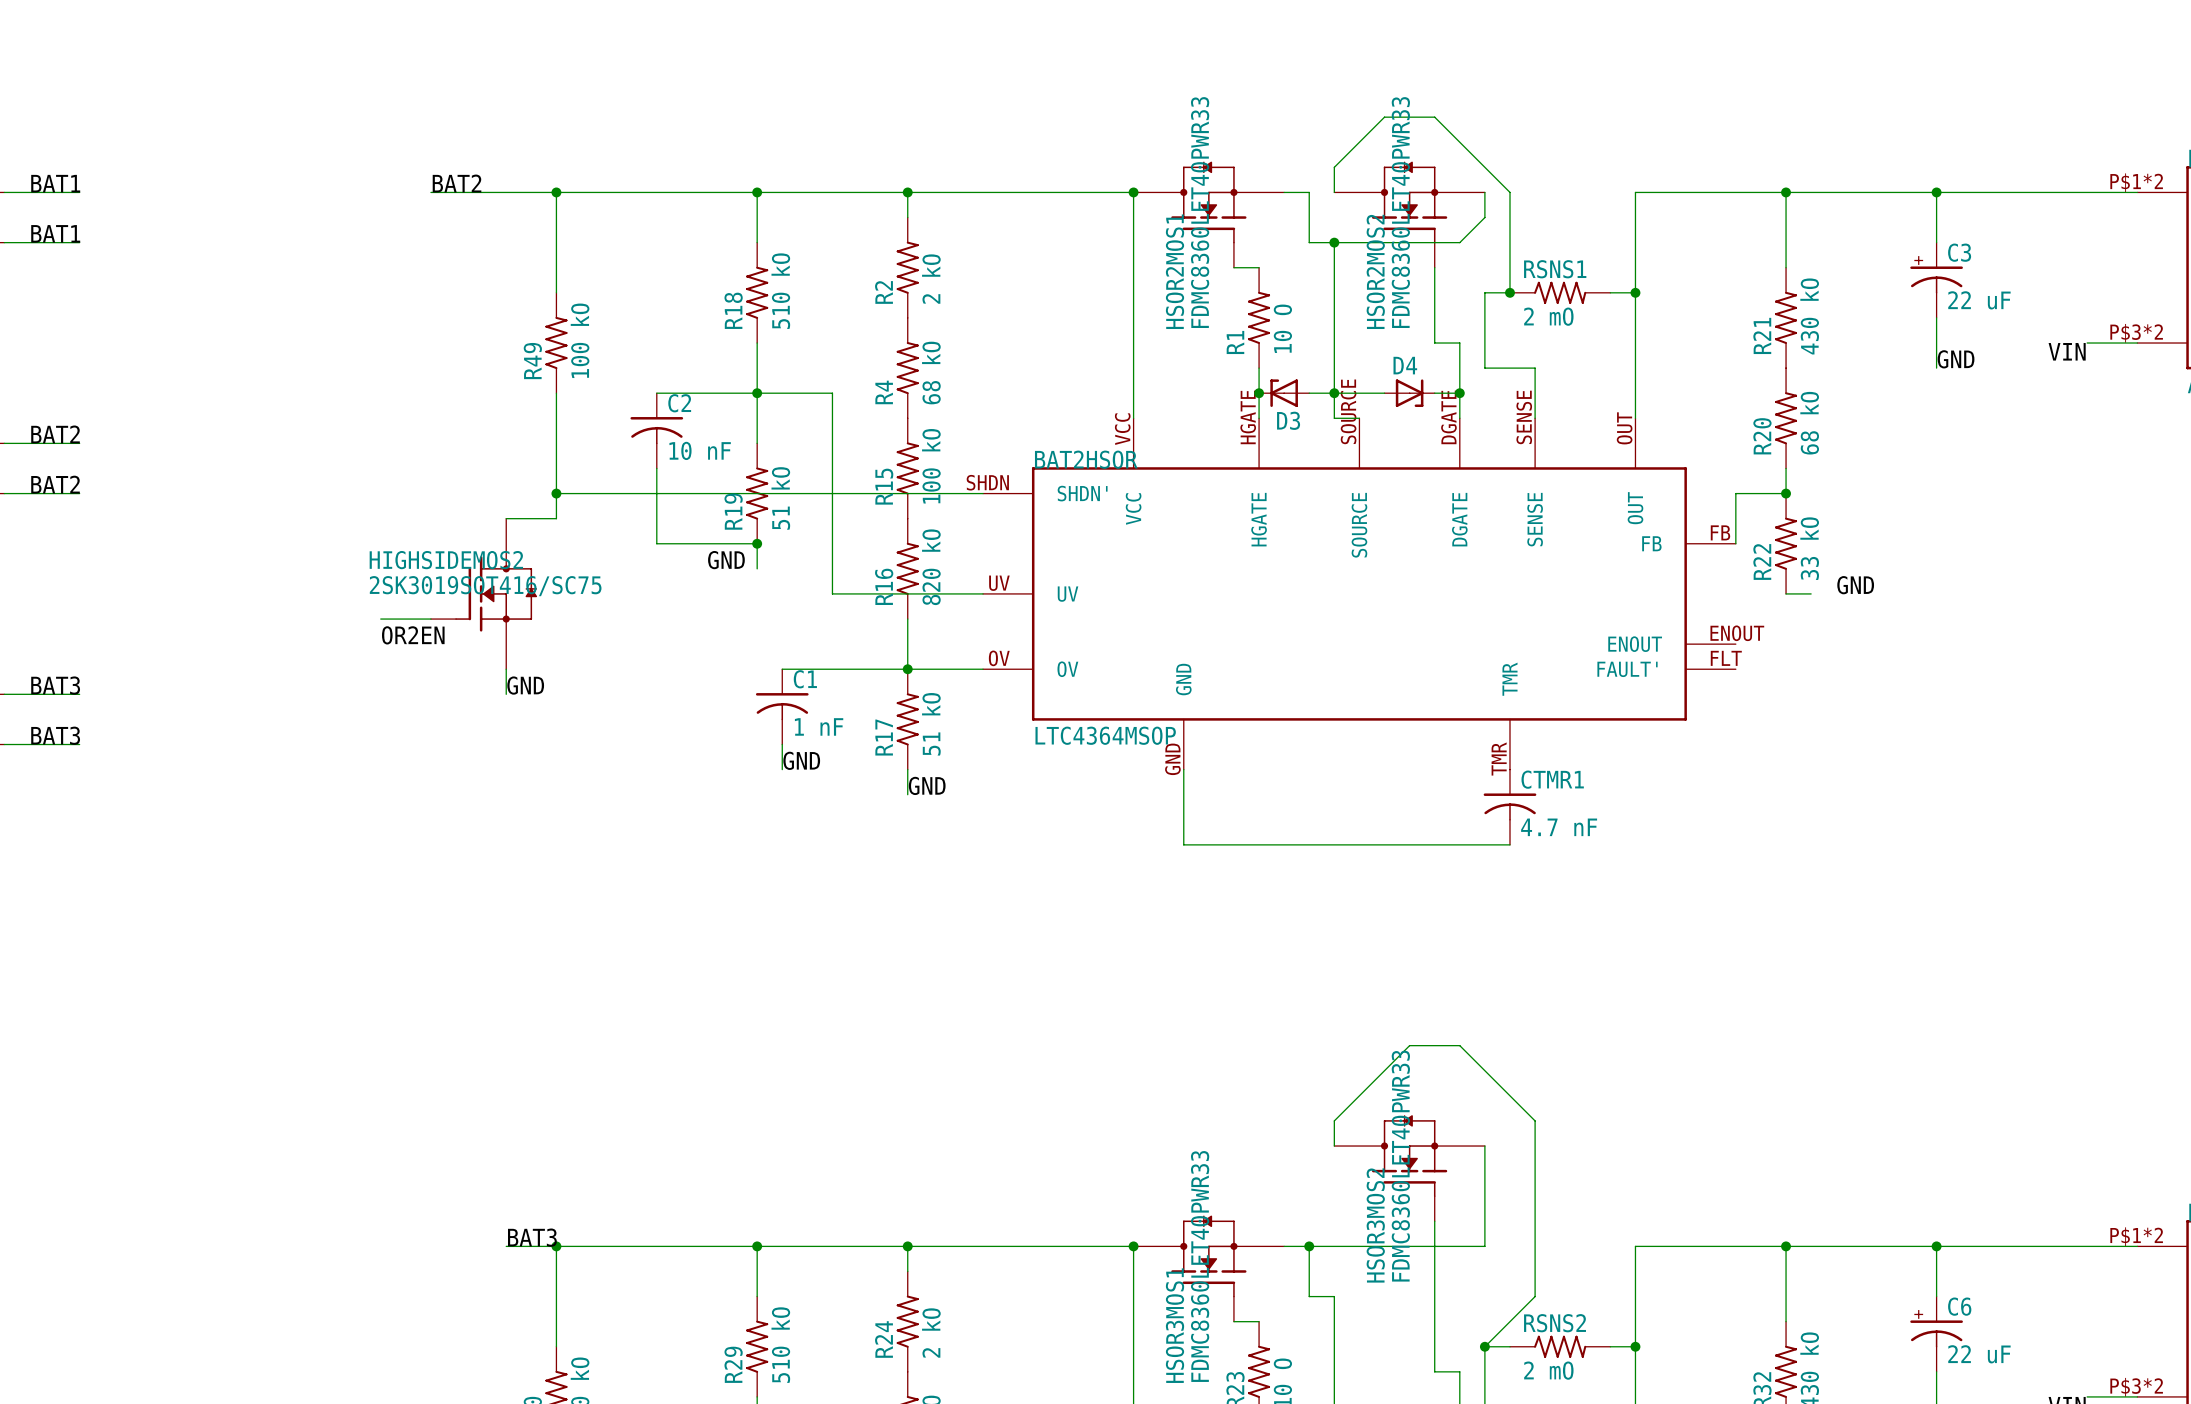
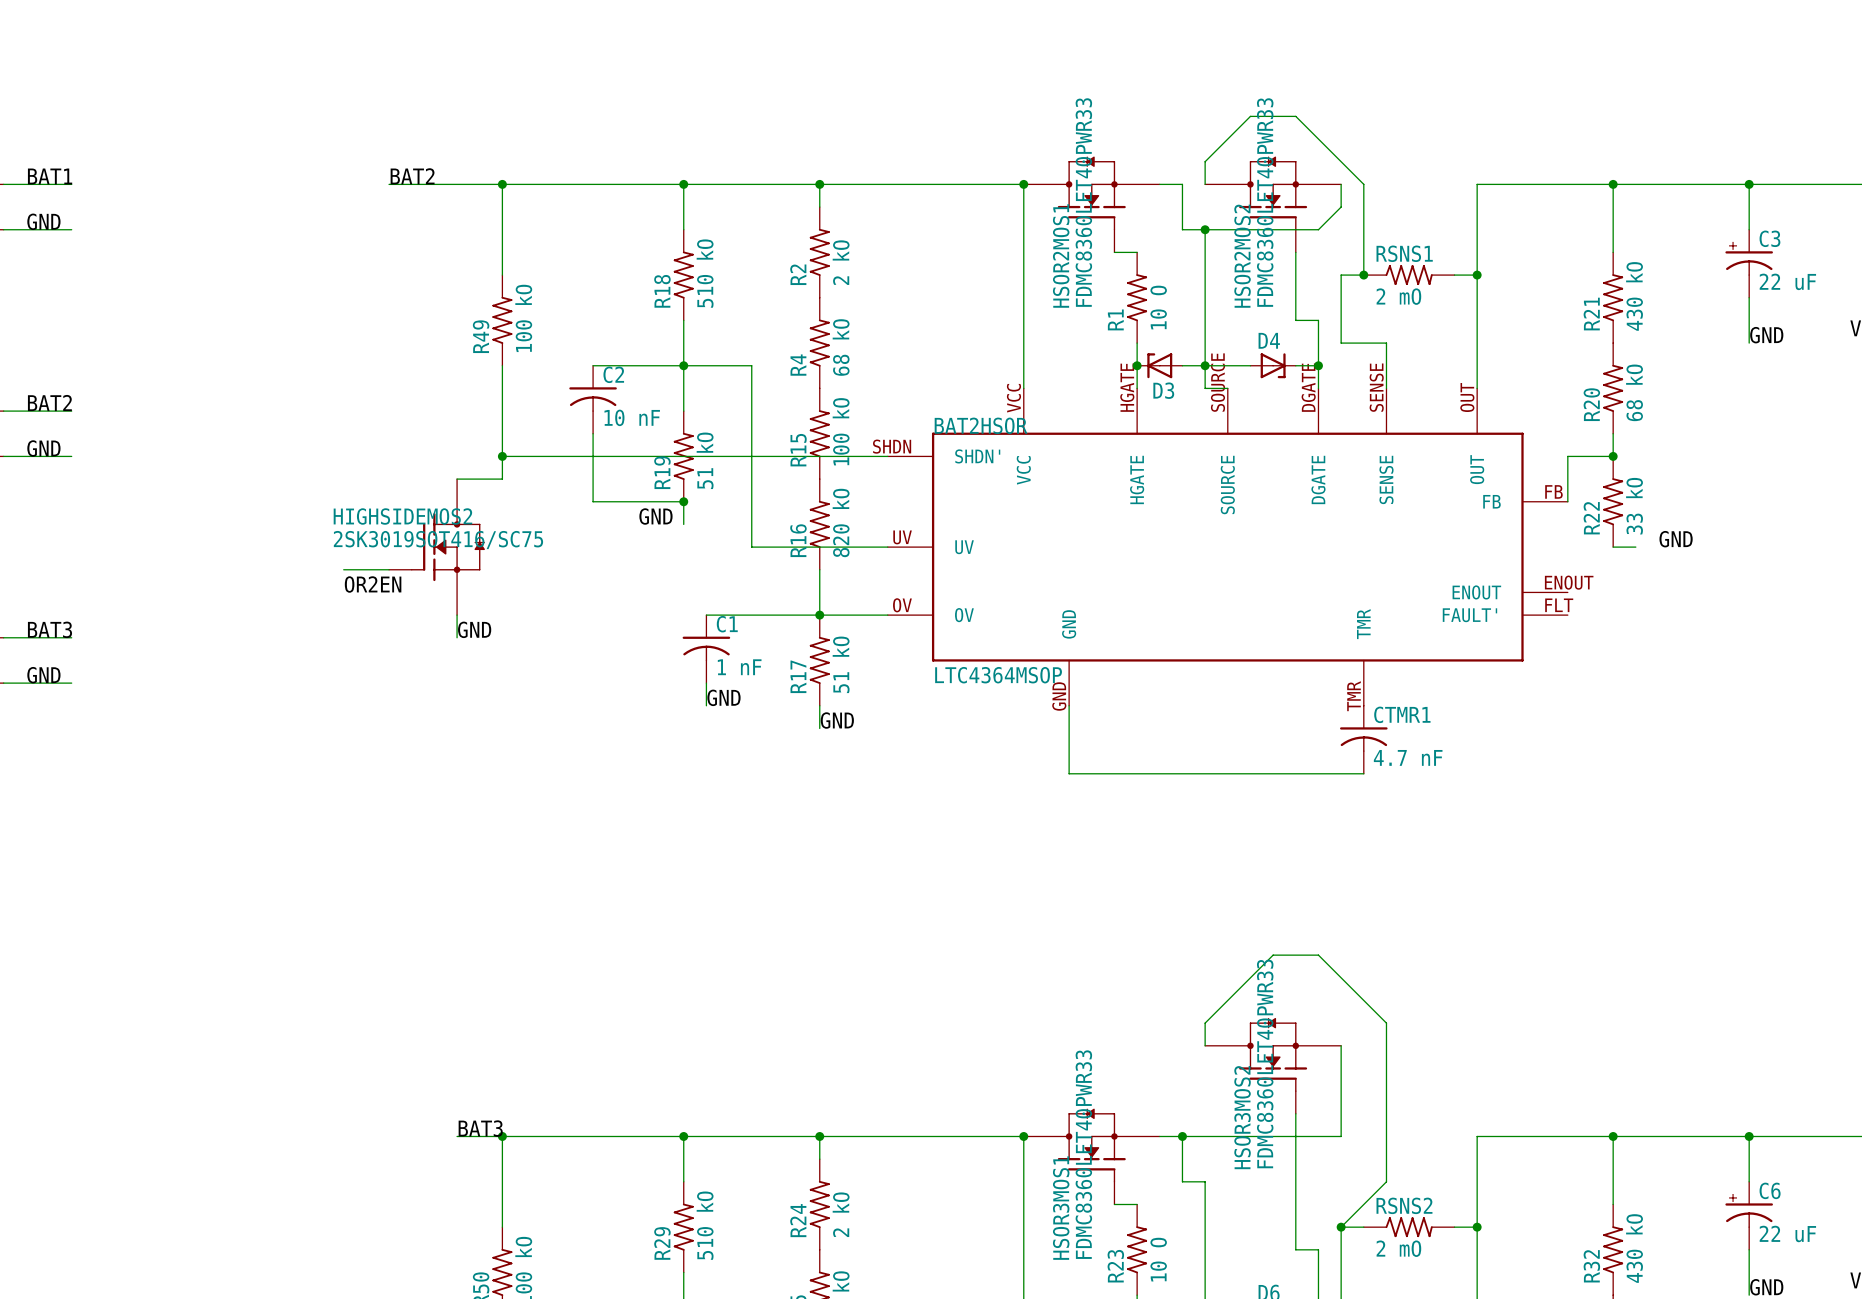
label: BAT1 (55, 233) -> GND (43, 221)
label: BAT2 (55, 484) -> GND (43, 448)
label: BAT3 (55, 735) -> GND (43, 675)

